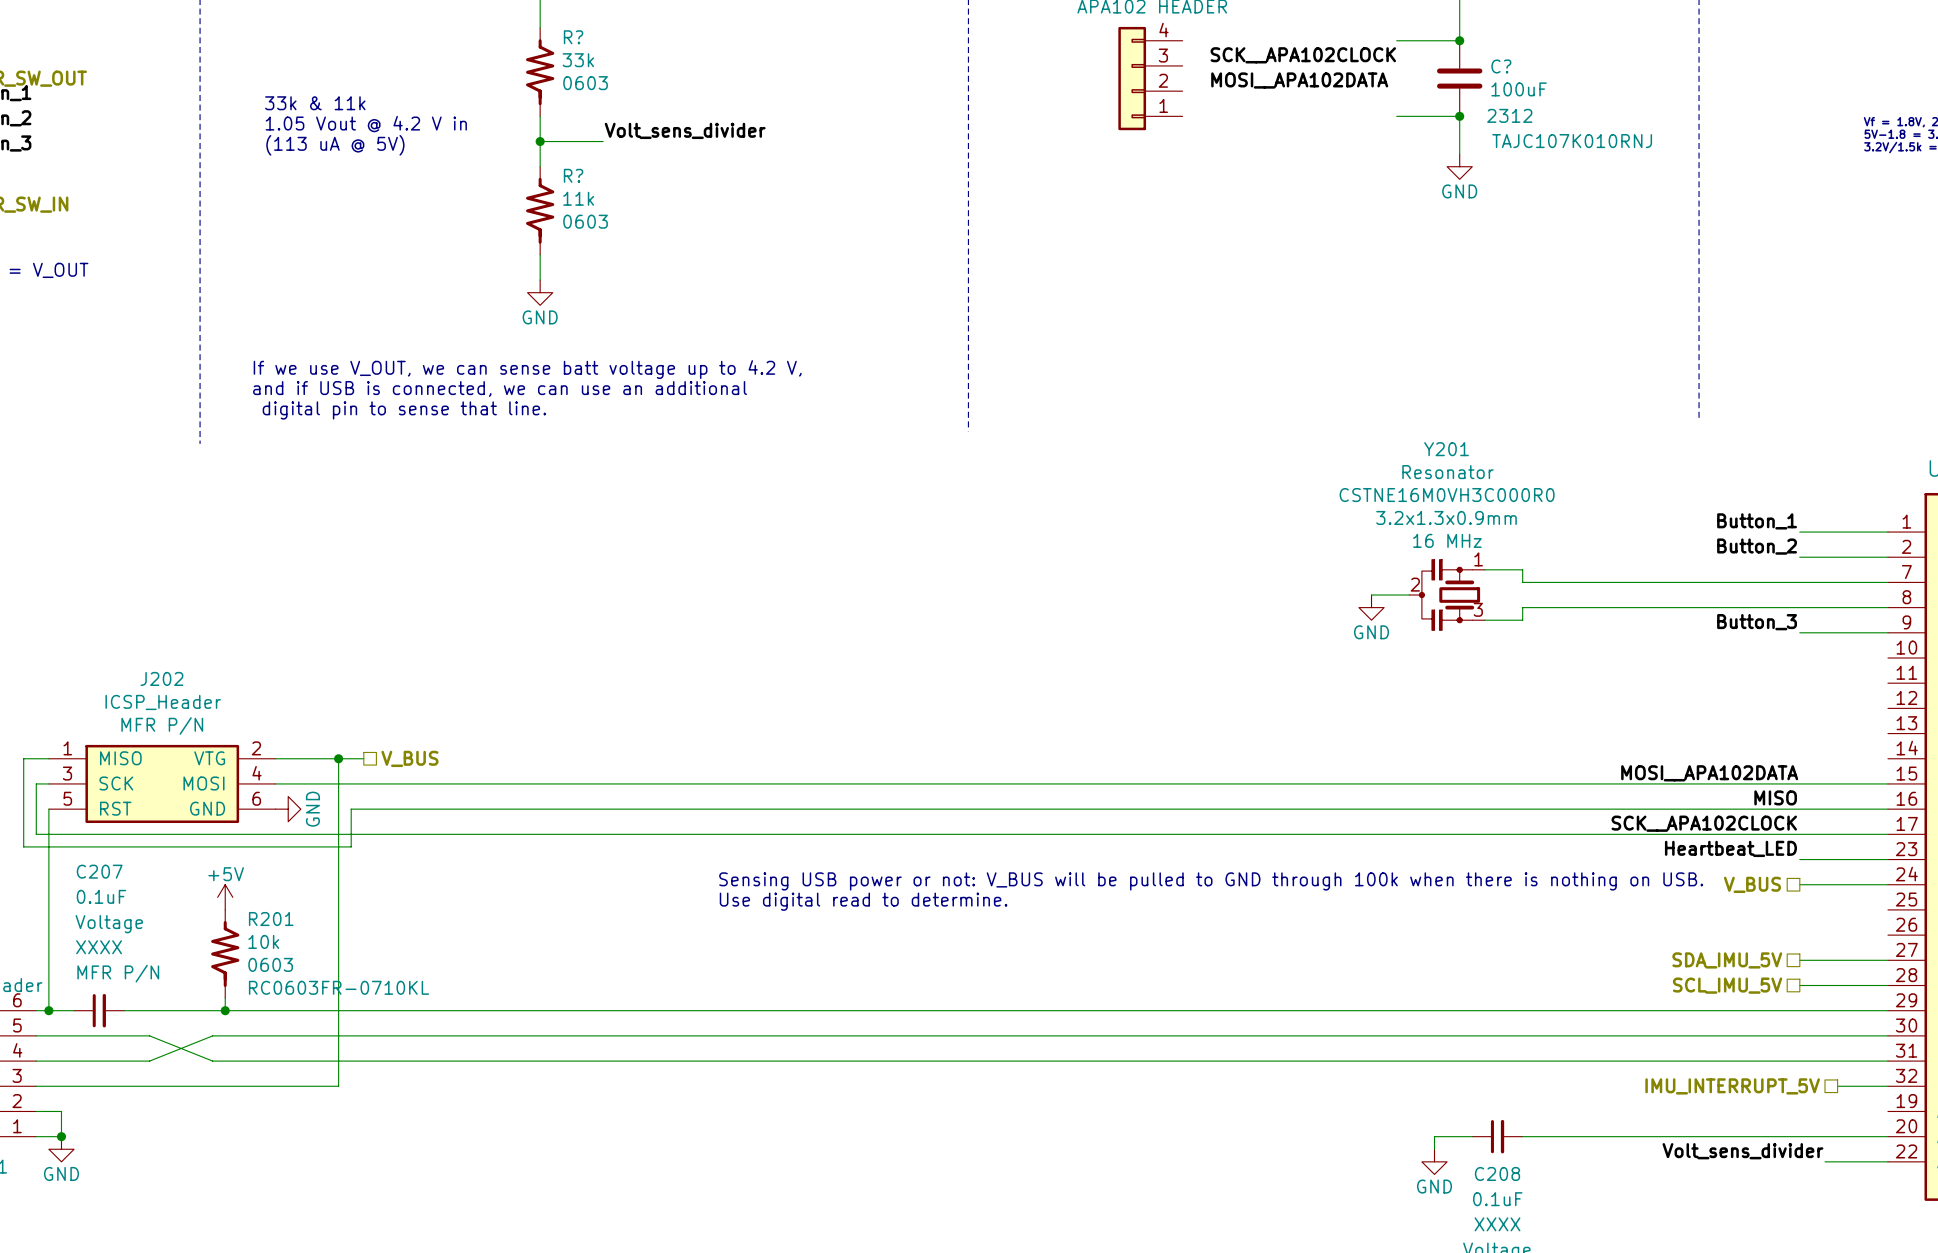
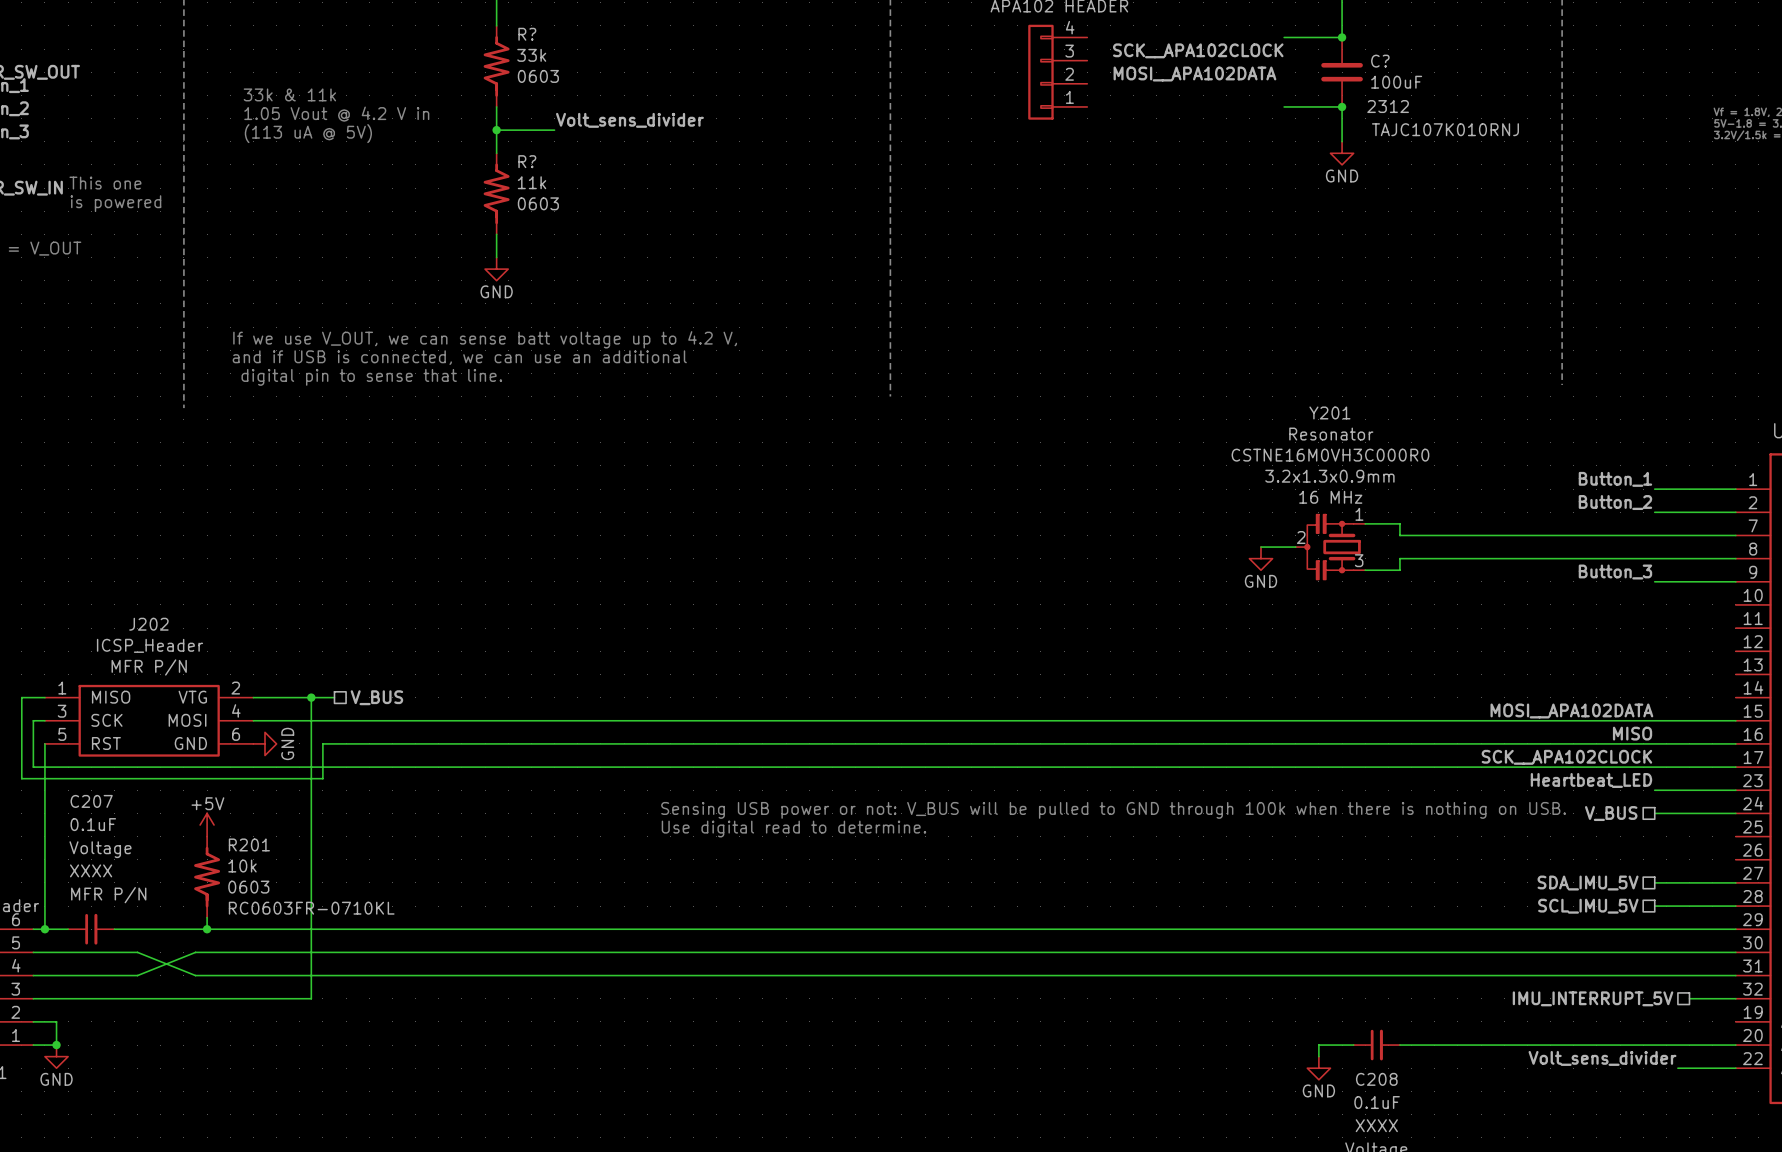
text: none -> This one (105, 183)
text: none -> is powered (115, 203)

